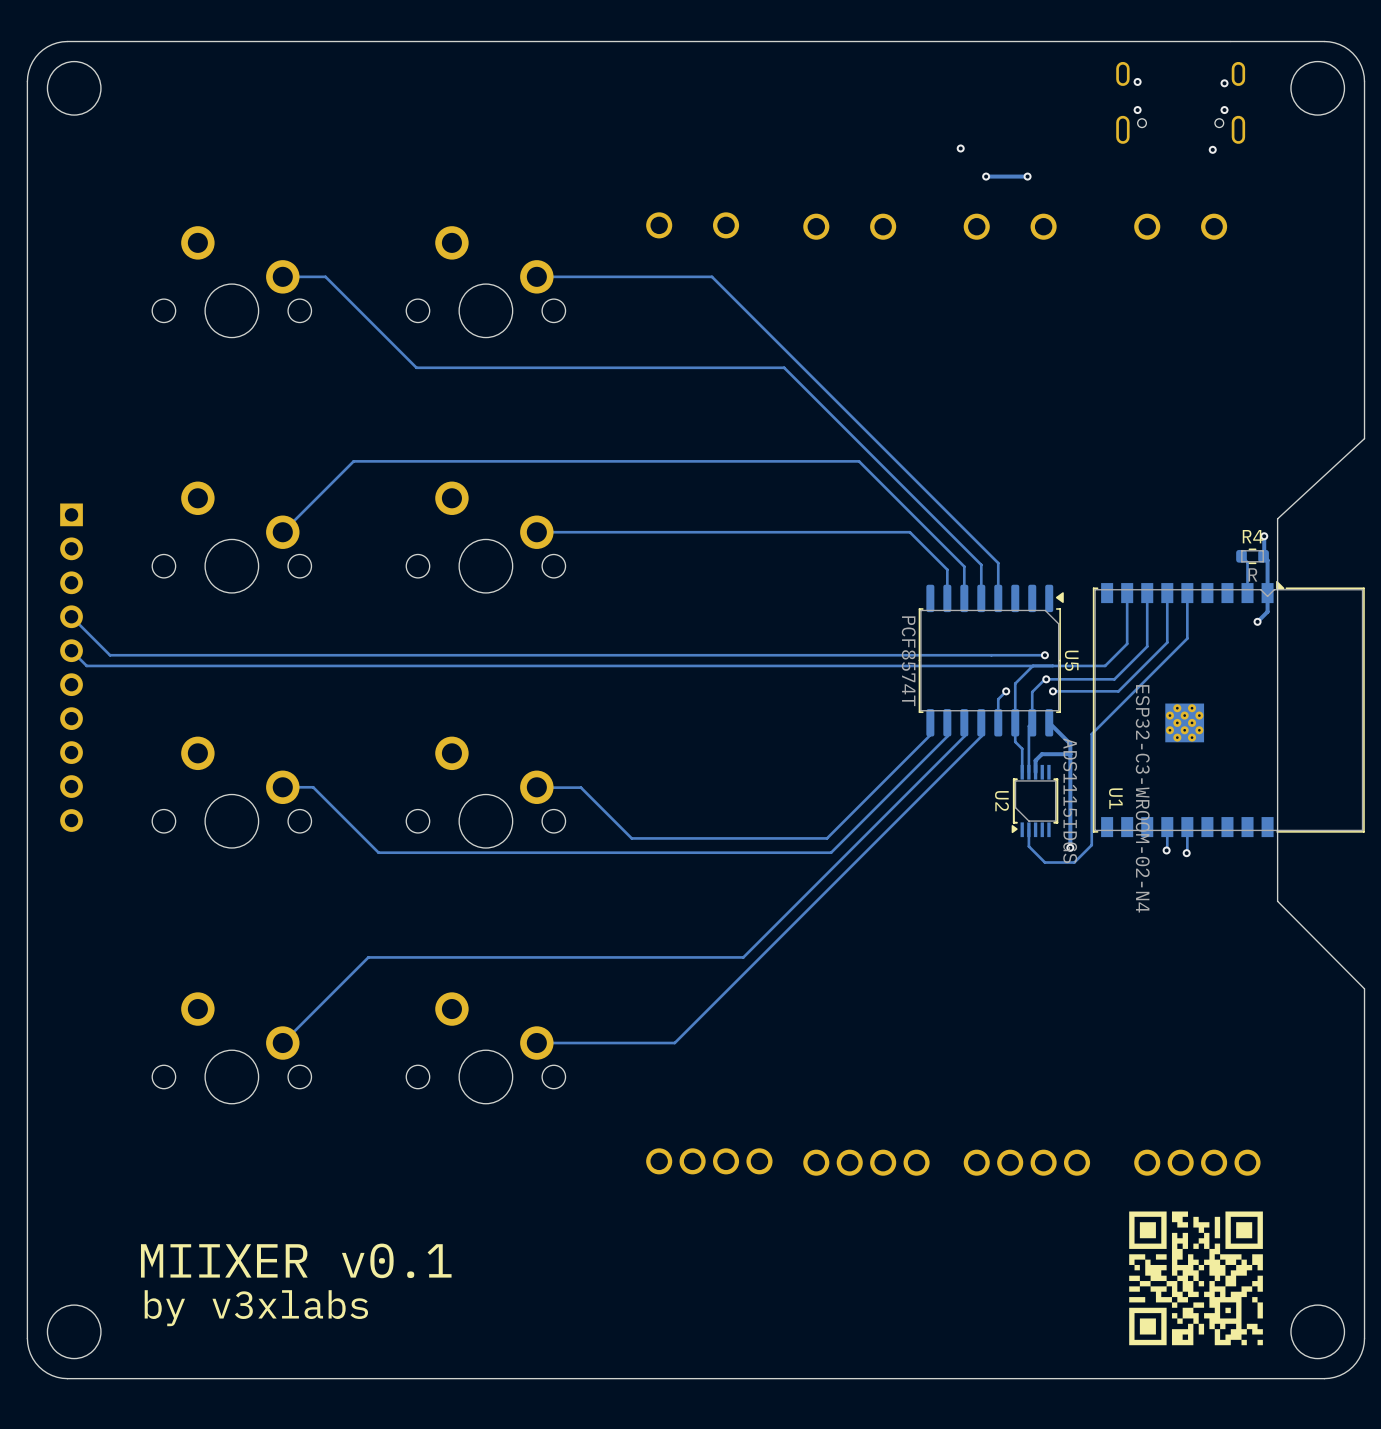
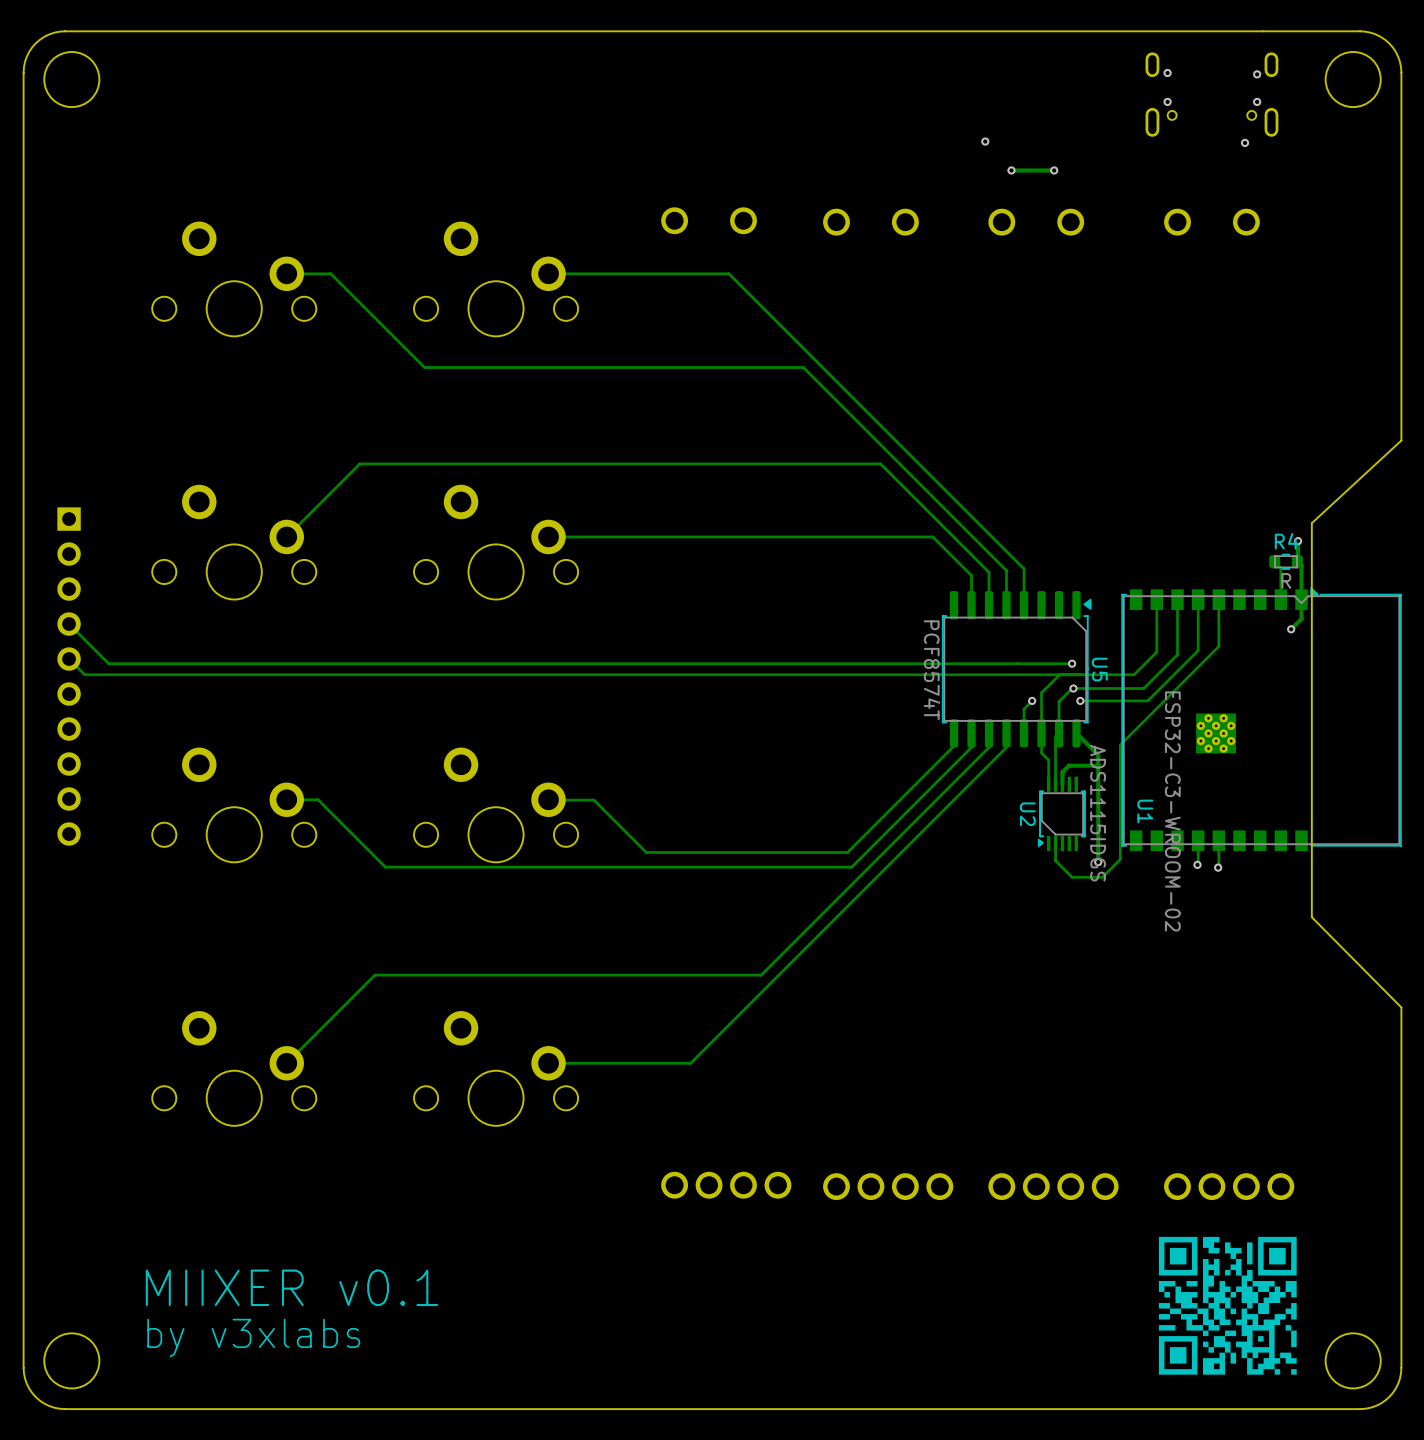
U1 value: ESP32-C3-WROOM-02-N4 (1142, 798) -> ESP32-C3-WROOM-02 (1172, 811)

